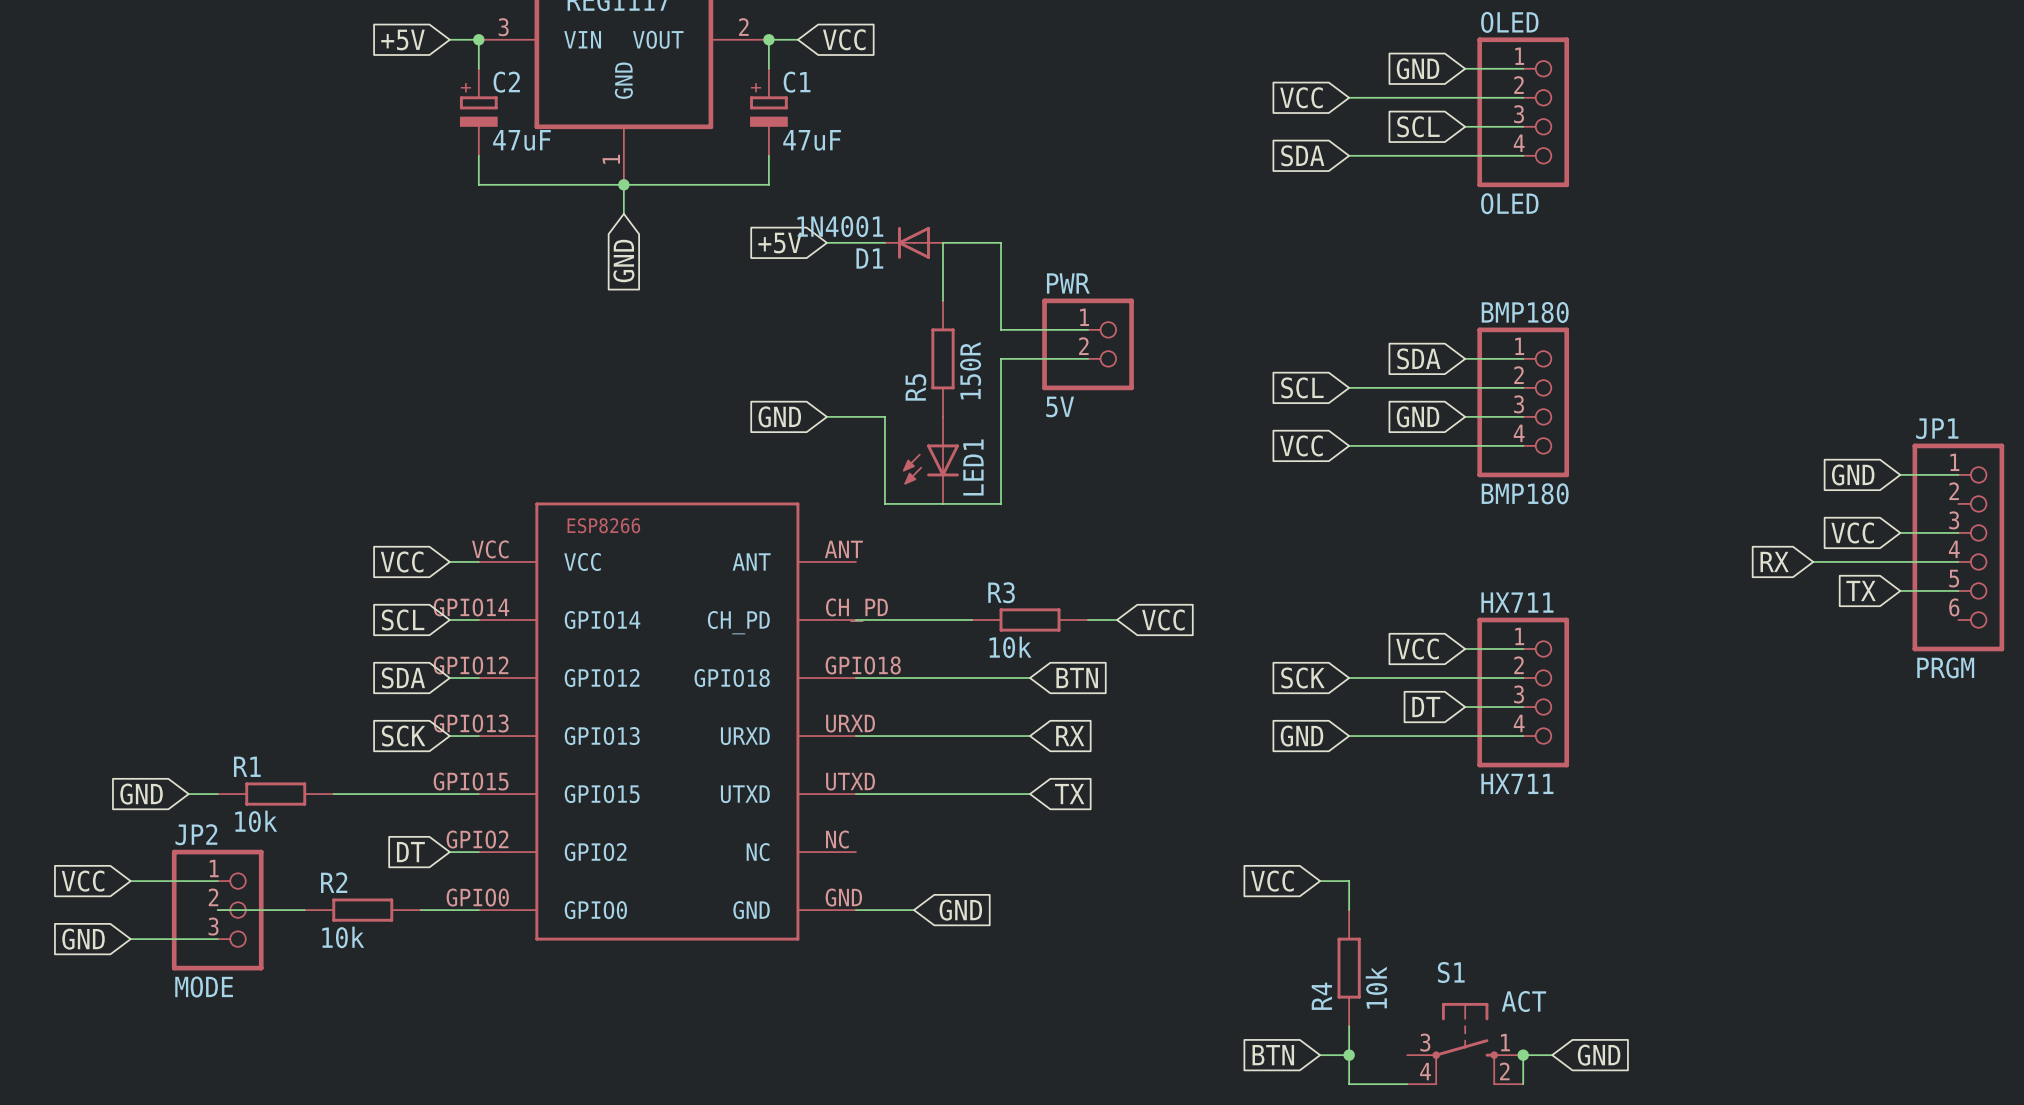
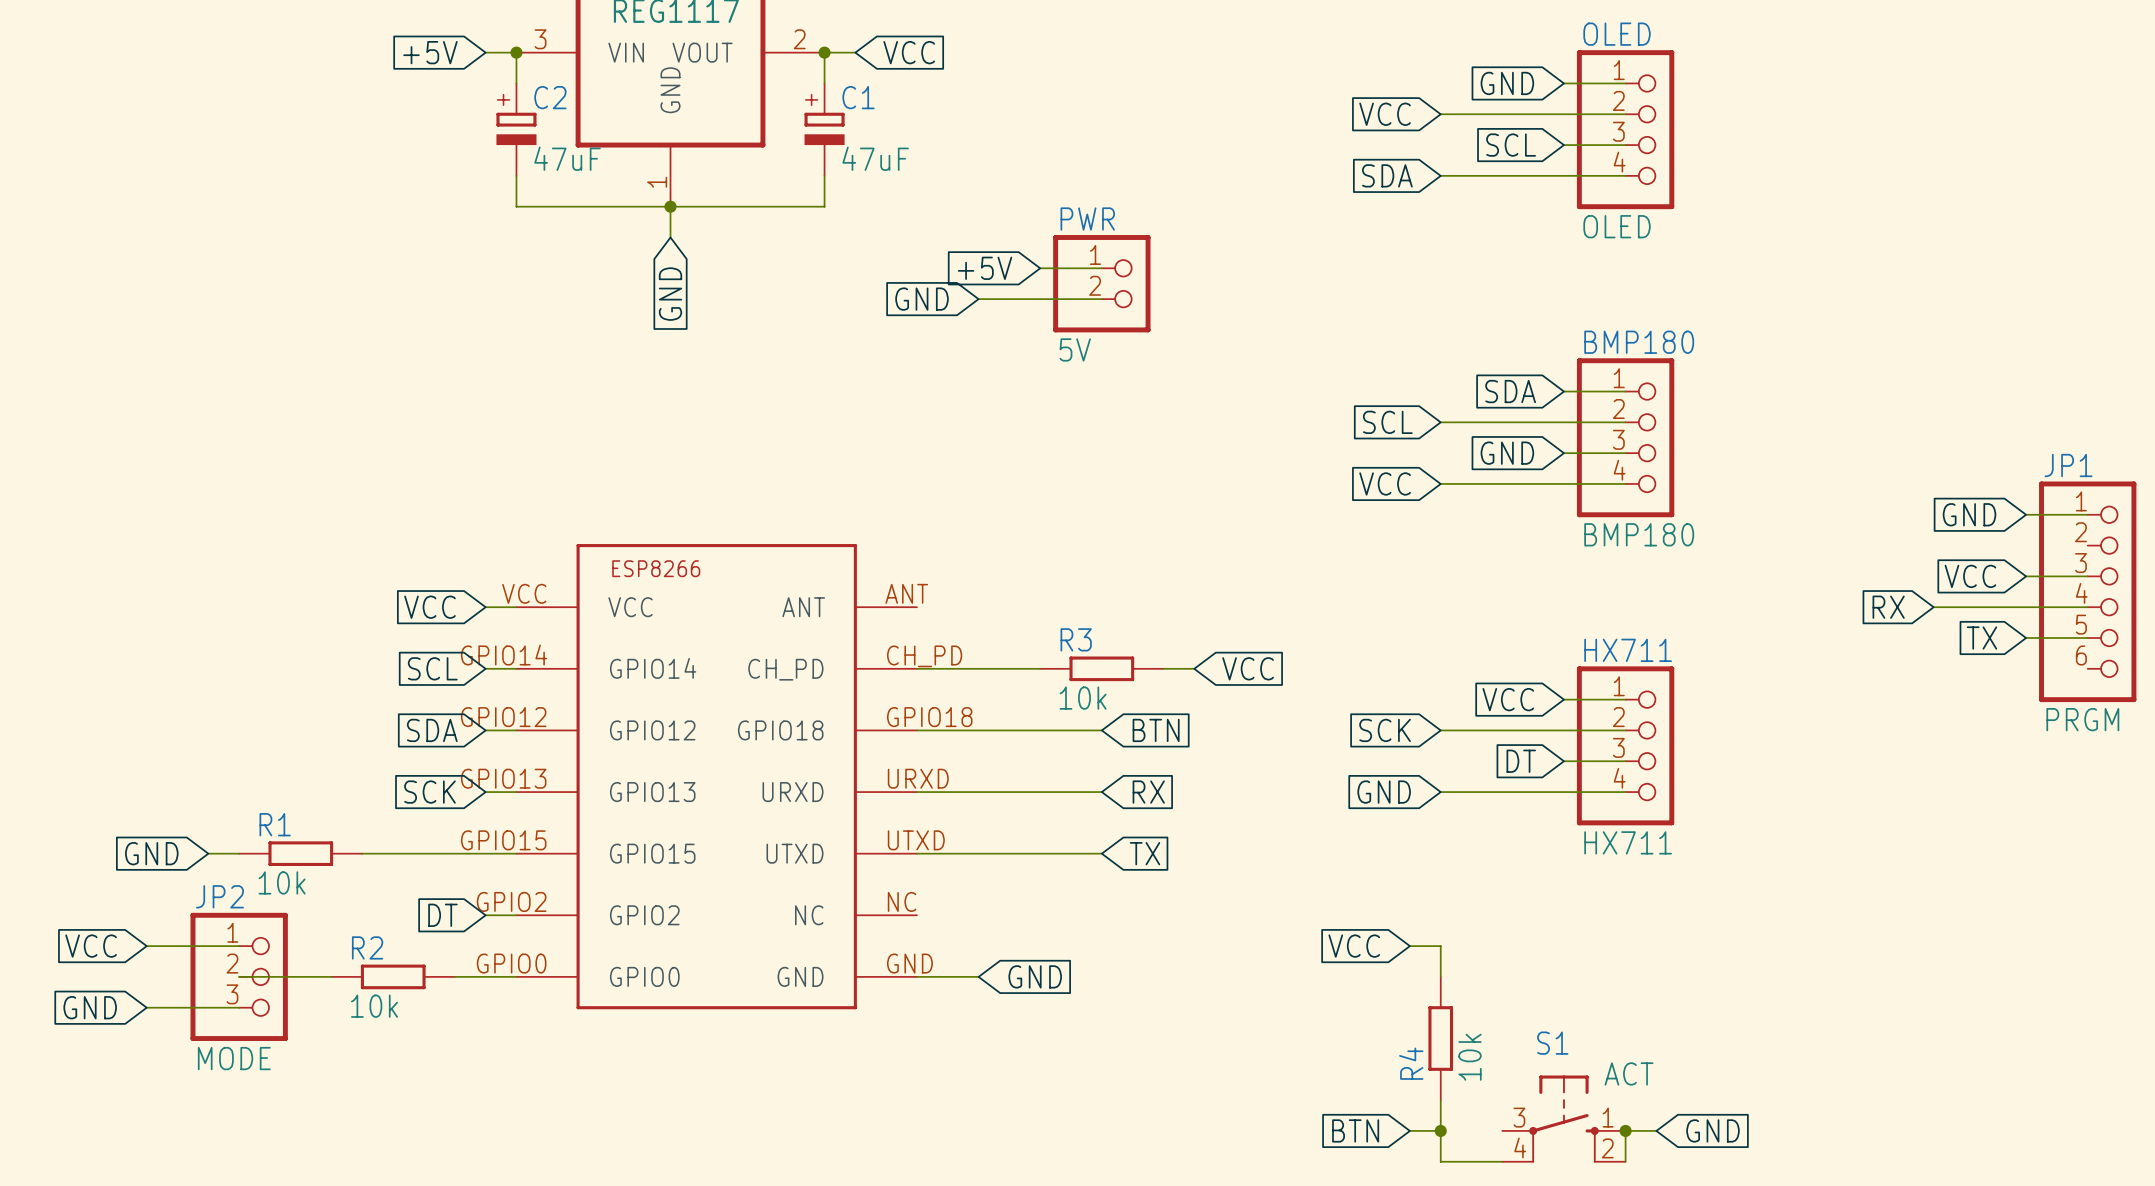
wire: (826, 242) (884, 242) -> none
D1: 1N4001 (913, 242) -> none
wire: (972, 242) (942, 242) (942, 300) -> none
wire: (1001, 242) (1001, 329) (1088, 329) -> (1071, 268) (1101, 268)
global label position: +5V (780, 243) -> +5V (985, 268)
wire: none -> (978, 299) (1101, 299)
PWR position: (1088, 344) -> (1101, 283)
R5: 150R (942, 358) -> none
wire: (1088, 358) (1001, 358) (1001, 503) (884, 503) (884, 416) (826, 416) -> none
global label position: GND (779, 416) -> GND (922, 299)
LED1: (930, 460) -> none

